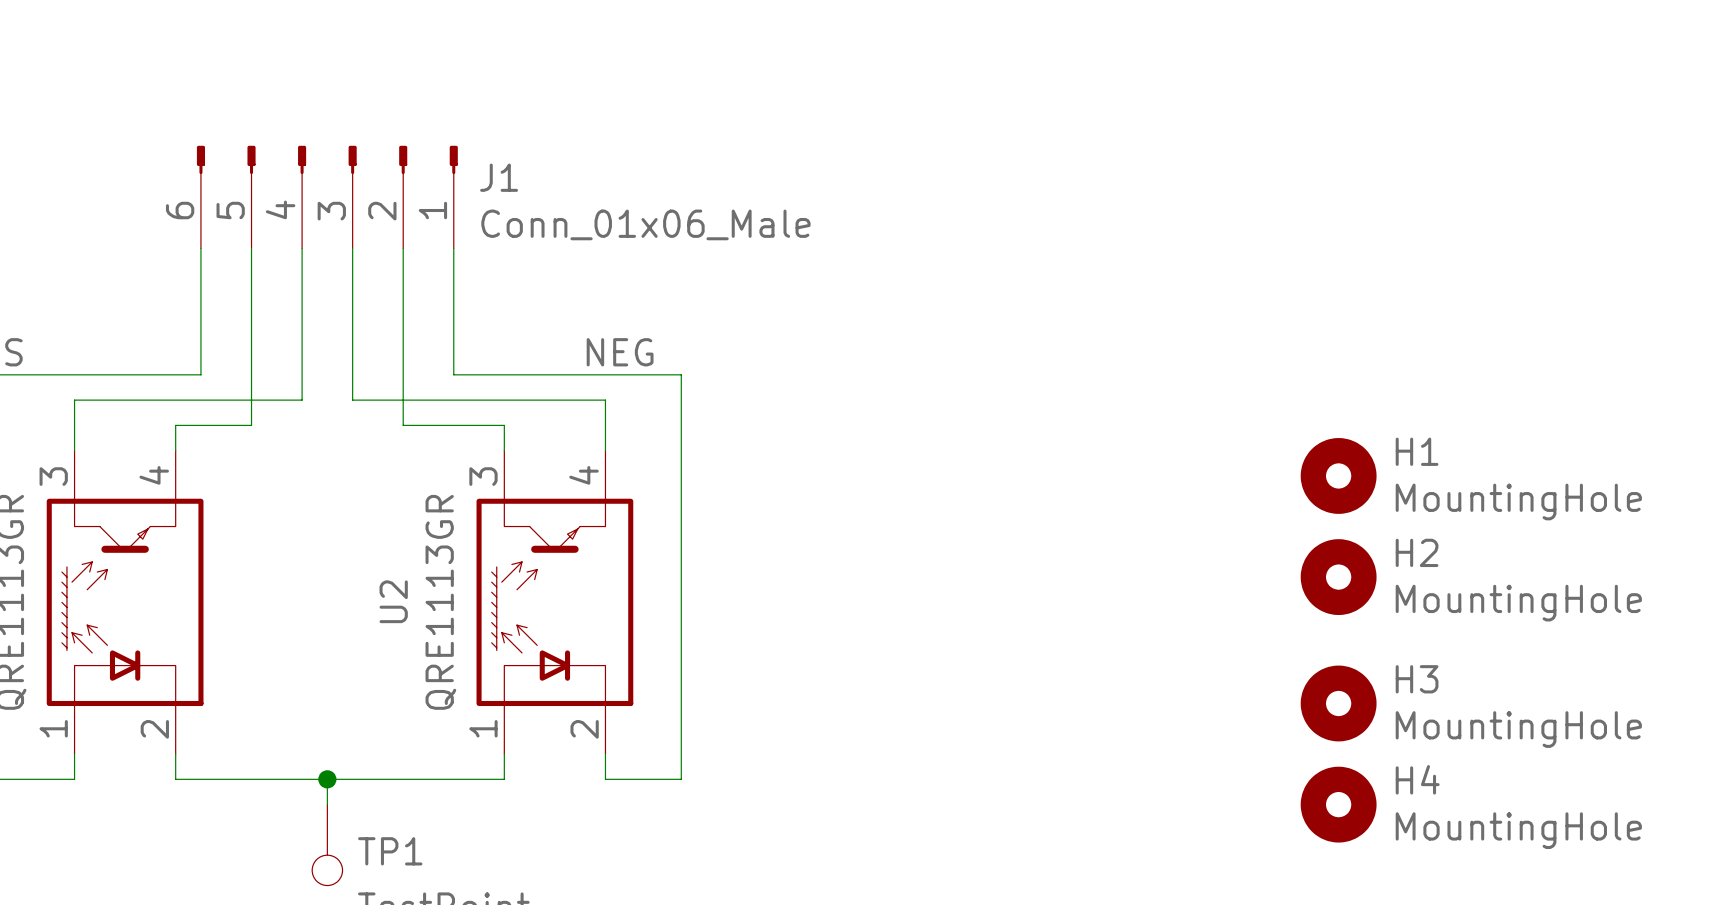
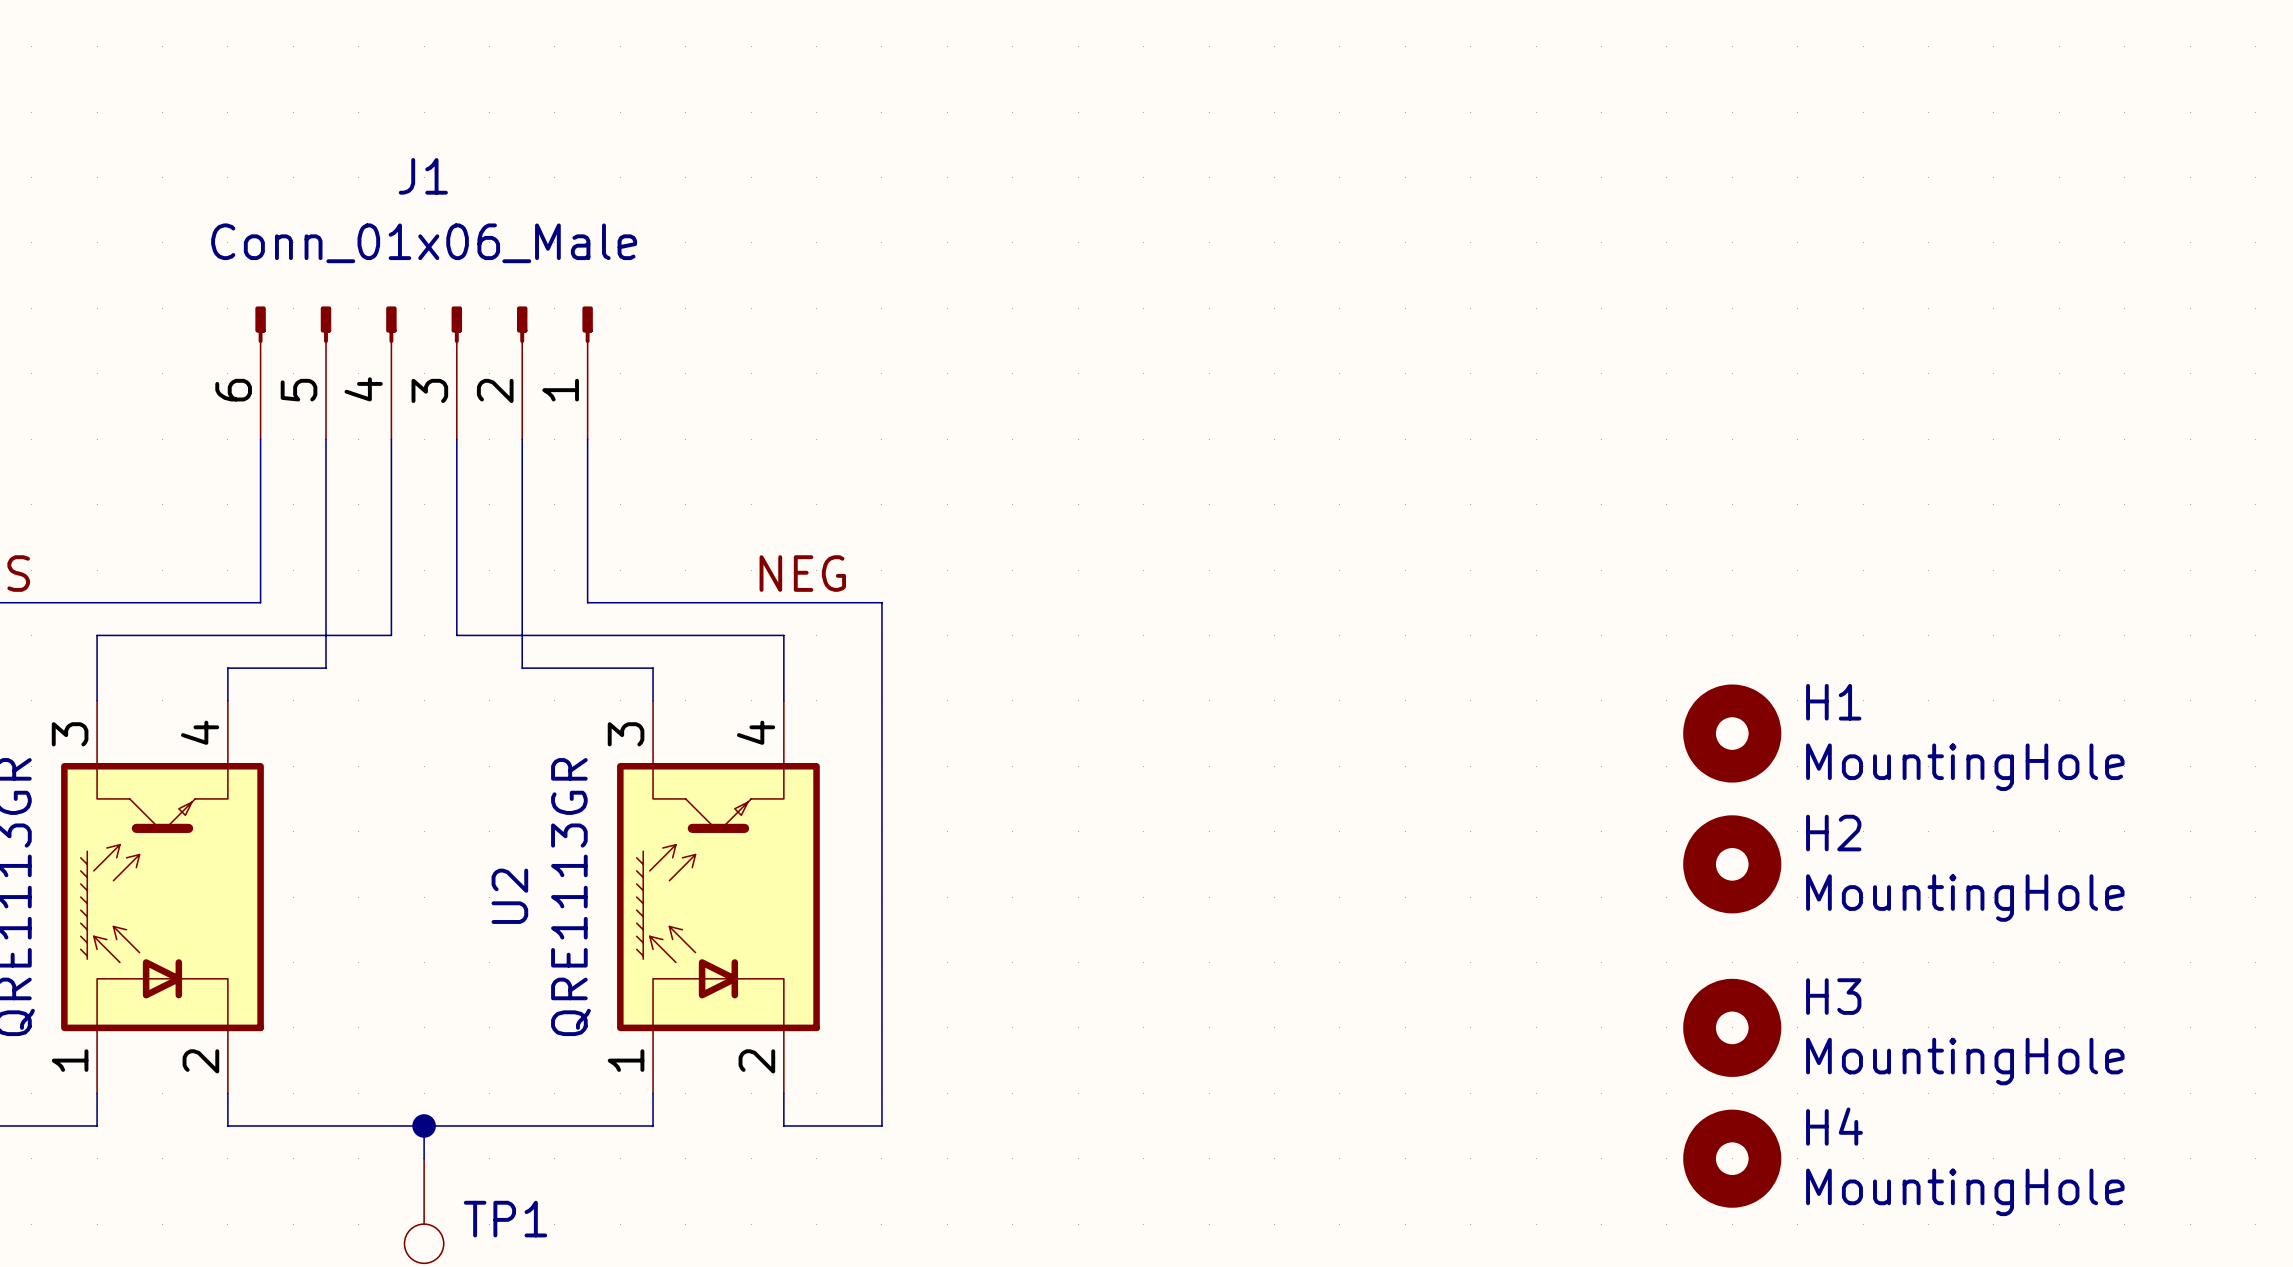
J1 name position: J1 (499, 177) -> J1 (423, 176)
J1 value position: Conn_01x06_Male (645, 224) -> Conn_01x06_Male (424, 243)

